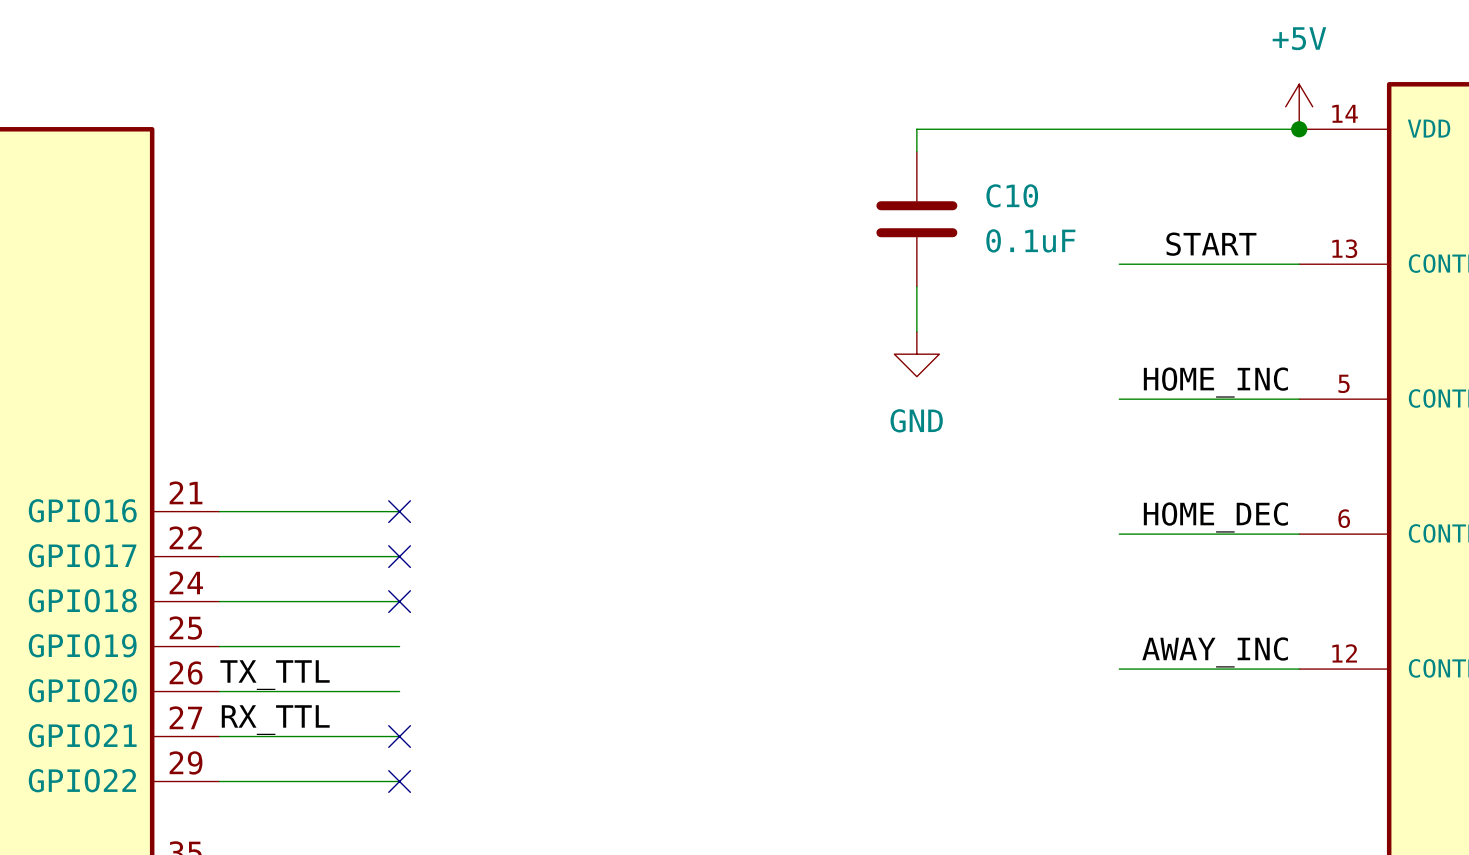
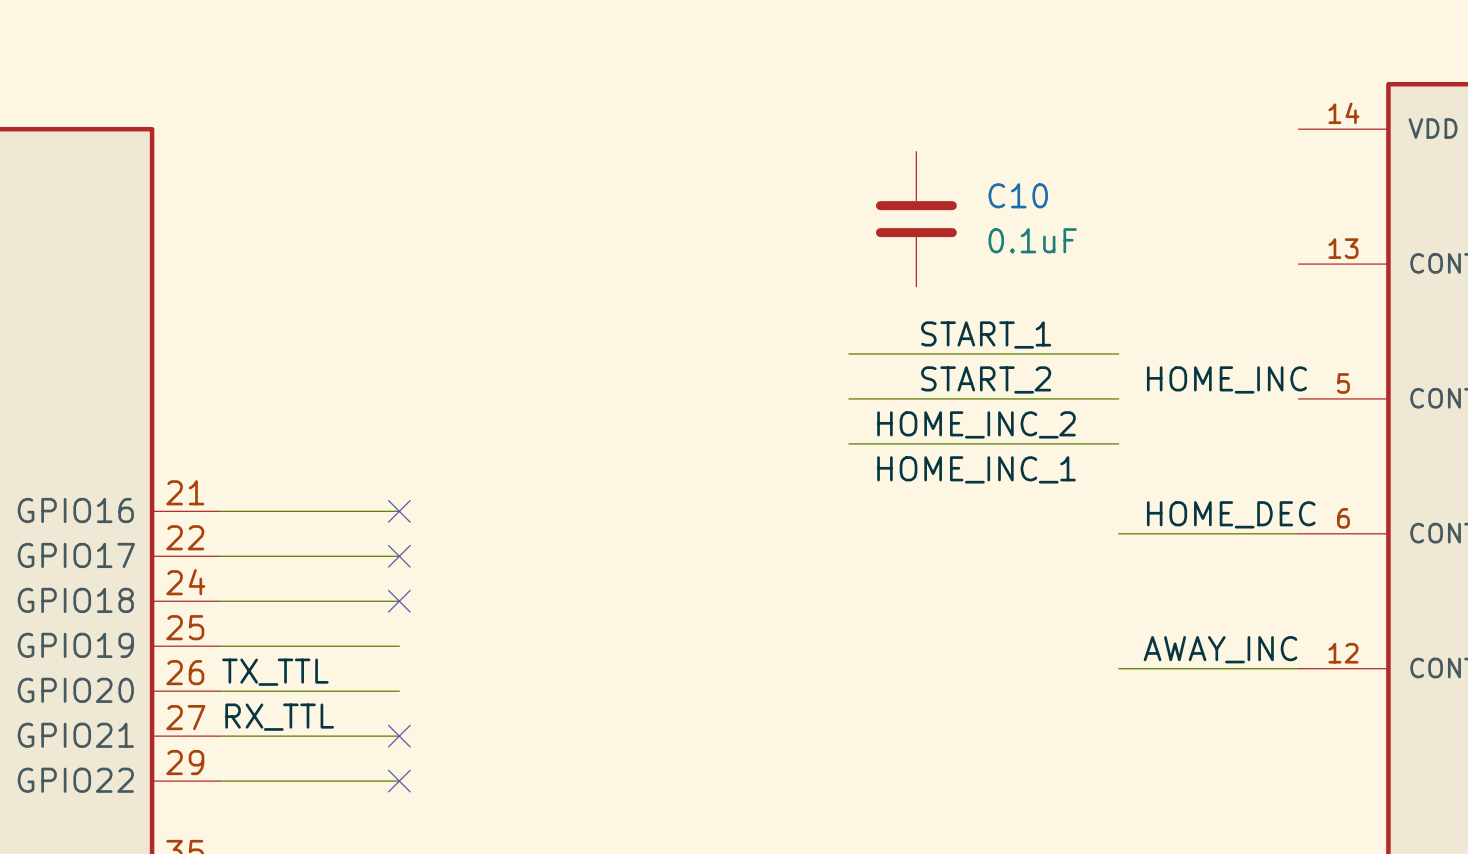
power symbol: +5V (1299, 106) -> none
wire: (1299, 129) (916, 129) (916, 151) -> none
junction: (1299, 129) -> none
label: START (1211, 244) -> none
wire: (1119, 264) (1299, 264) -> none
wire: (916, 286) (916, 331) -> none
label: none -> START_1 (986, 335)
wire: none -> (848, 353) (1118, 353)
power symbol: GND (916, 354) -> none
label: none -> START_2 (986, 379)
wire: (1119, 399) (1299, 399) -> (1118, 398) (848, 398)
label: none -> HOME_INC_2 (976, 424)
wire: none -> (848, 443) (1118, 443)
label: none -> HOME_INC_1 (976, 469)

